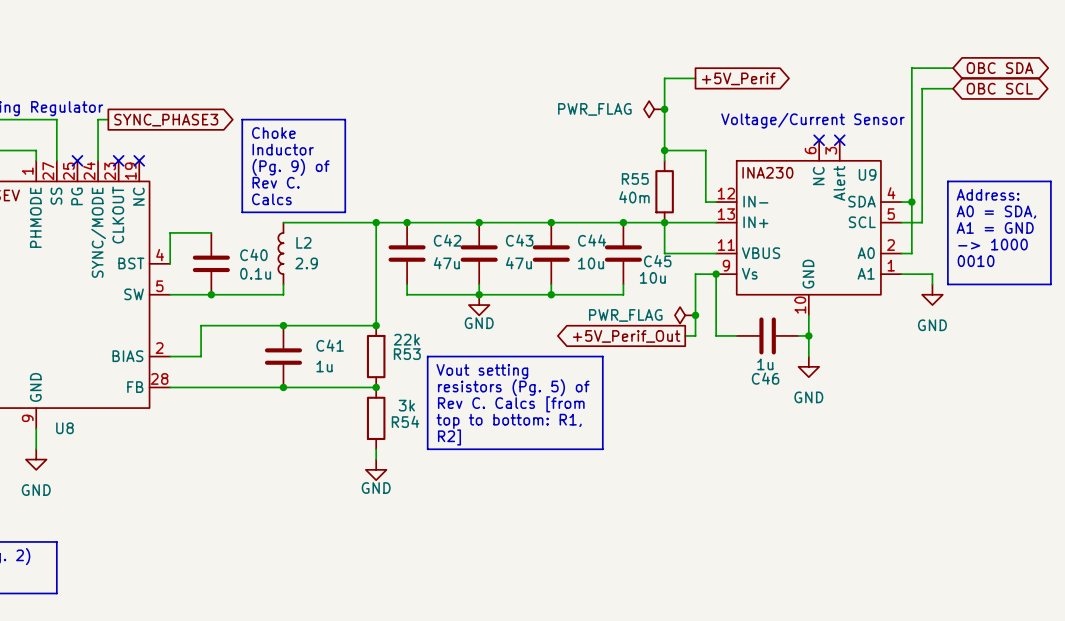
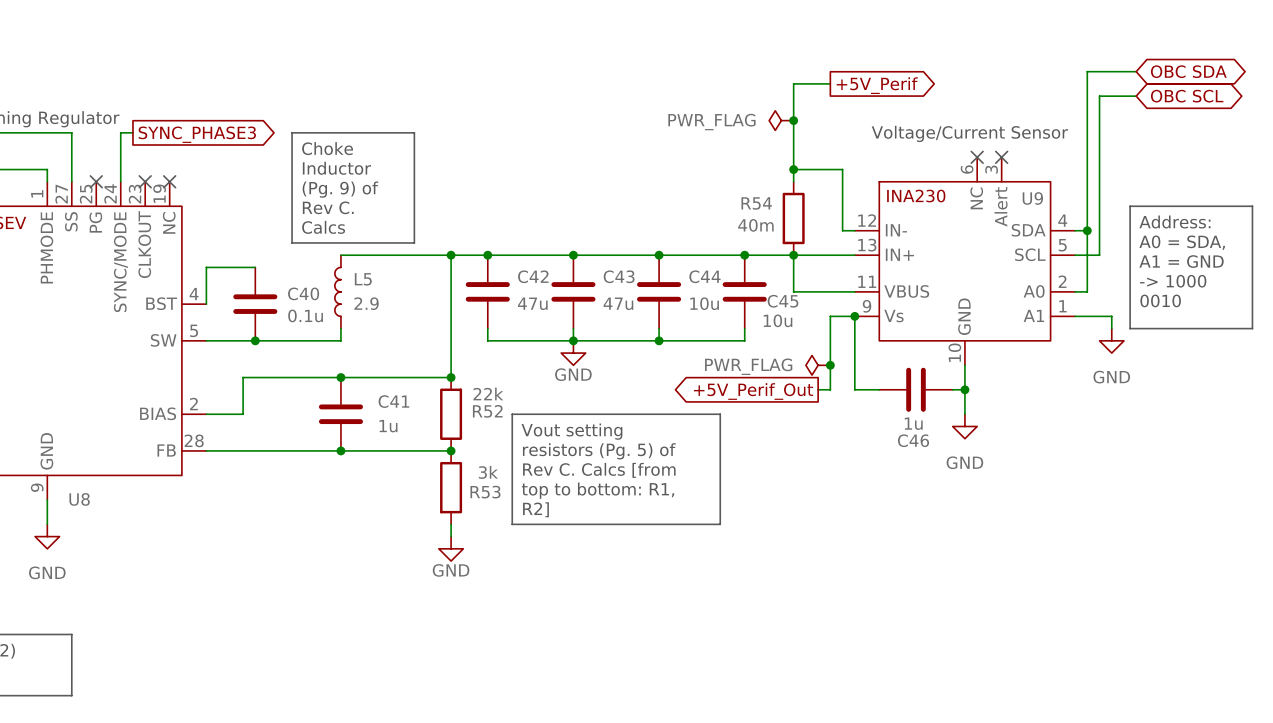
R55 name: R55 (635, 178) -> R54 (756, 203)
L2 name: L2 (303, 242) -> L5 (363, 279)
R53 name: R53 (407, 354) -> R52 (487, 411)
R54 name: R54 (405, 421) -> R53 (485, 492)

